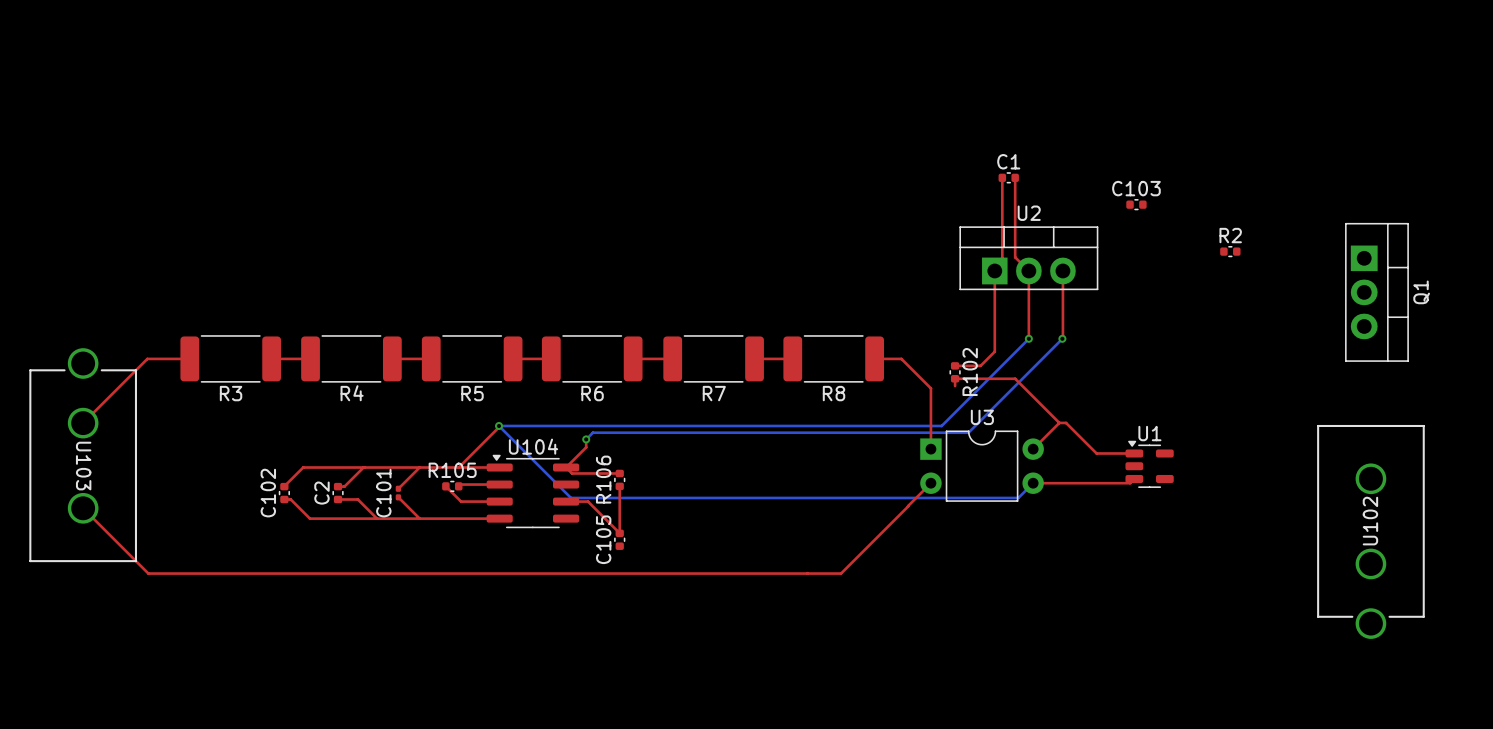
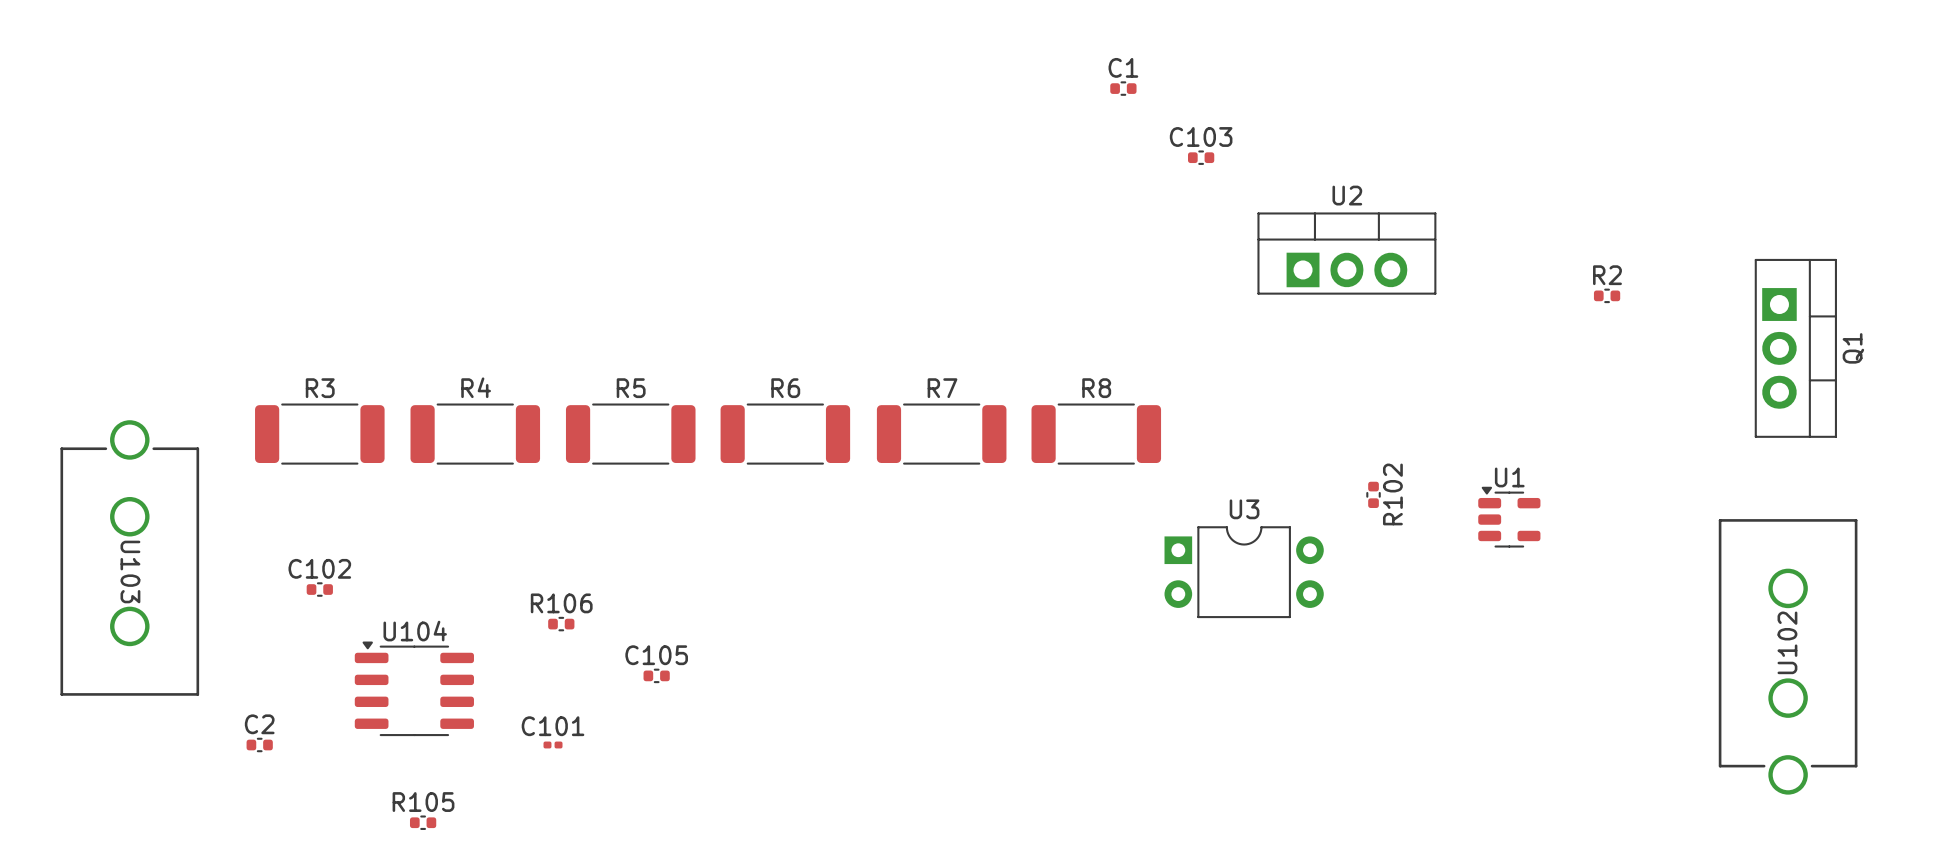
top track: (1002, 177) (1002, 258) (994, 265) (994, 351) (980, 365) (955, 365) -> none
C1 position: (1008, 177) -> (1123, 88)
top track: (1015, 177) (1015, 257) (1028, 270) (1028, 338) -> none
C103 position: (1136, 204) -> (1201, 157)
U2 position: (1028, 258) -> (1346, 253)
top track: (1062, 270) (1062, 338) -> none
bottom track: (1028, 338) (941, 425) (499, 425) (570, 497) (1018, 497) (1033, 483) -> none
via: (1028, 338) -> none
bottom track: (1062, 338) (968, 432) (592, 432) (586, 439) -> none
via: (1062, 338) -> none
top track: (189, 358) (147, 358) (83, 423) -> none
top track: (271, 358) (310, 358) -> none
top track: (392, 358) (431, 358) -> none
top track: (513, 358) (551, 358) -> none
top track: (633, 358) (672, 358) -> none
top track: (754, 358) (792, 358) -> none
top track: (874, 358) (901, 358) (930, 388) (930, 449) -> none
R102 position: (955, 372) -> (1373, 494)
top track: (955, 386) (955, 378) (1015, 378) (1059, 422) -> none
R3 name position: R3 (231, 393) -> R3 (320, 388)
R4 name position: R4 (352, 393) -> R4 (476, 387)
R5 name position: R5 (472, 393) -> R5 (631, 388)
R6 name position: R6 (592, 393) -> R6 (785, 388)
R7 name position: R7 (714, 393) -> R7 (942, 388)
R8 name position: R8 (834, 393) -> R8 (1096, 388)
top track: (1059, 422) (1033, 449) -> none
top track: (1059, 422) (1066, 422) (1096, 453) (1134, 453) -> none
top track: (499, 425) (458, 467) -> none
via: (499, 425) -> none
top track: (586, 439) (586, 447) (566, 467) (572, 473) (619, 473) -> none
via: (586, 439) -> none
U1 position: (1149, 464) -> (1509, 517)
U3 position: (982, 466) -> (1244, 572)
top track: (363, 467) (344, 486) (338, 486) -> none
top track: (419, 467) (398, 488) -> none
top track: (499, 467) (303, 467) (284, 486) -> none
top track: (1134, 478) (1130, 483) (1033, 483) -> none
R106 rotation: 0° (619, 479) -> 90° clockwise (561, 624)
R106 position: (619, 479) -> (561, 624)
top track: (930, 483) (841, 573) (148, 573) (83, 508) -> none
top track: (499, 484) (460, 484) (458, 486) -> none
top track: (445, 486) (461, 501) (499, 501) -> none
R105 position: (452, 486) -> (423, 822)
top track: (619, 486) (619, 533) (588, 501) (566, 501) -> none
U104 position: (532, 491) -> (414, 688)
C102 rotation: 0° (284, 493) -> 90° clockwise (319, 589)
C102 position: (284, 493) -> (319, 589)
C2 rotation: 0° (338, 493) -> 90° clockwise (259, 744)
C2 position: (338, 493) -> (259, 744)
C101 rotation: 0° (398, 493) -> 90° clockwise (553, 744)
C101 position: (398, 493) -> (553, 744)
top track: (398, 497) (419, 518) -> none
top track: (284, 499) (290, 499) (309, 518) (499, 518) -> none
top track: (338, 499) (357, 499) (377, 518) -> none
C105 rotation: 0° (619, 539) -> 90° clockwise (656, 675)
C105 position: (619, 539) -> (656, 675)
top track: (807, 573) (807, 573) -> none

